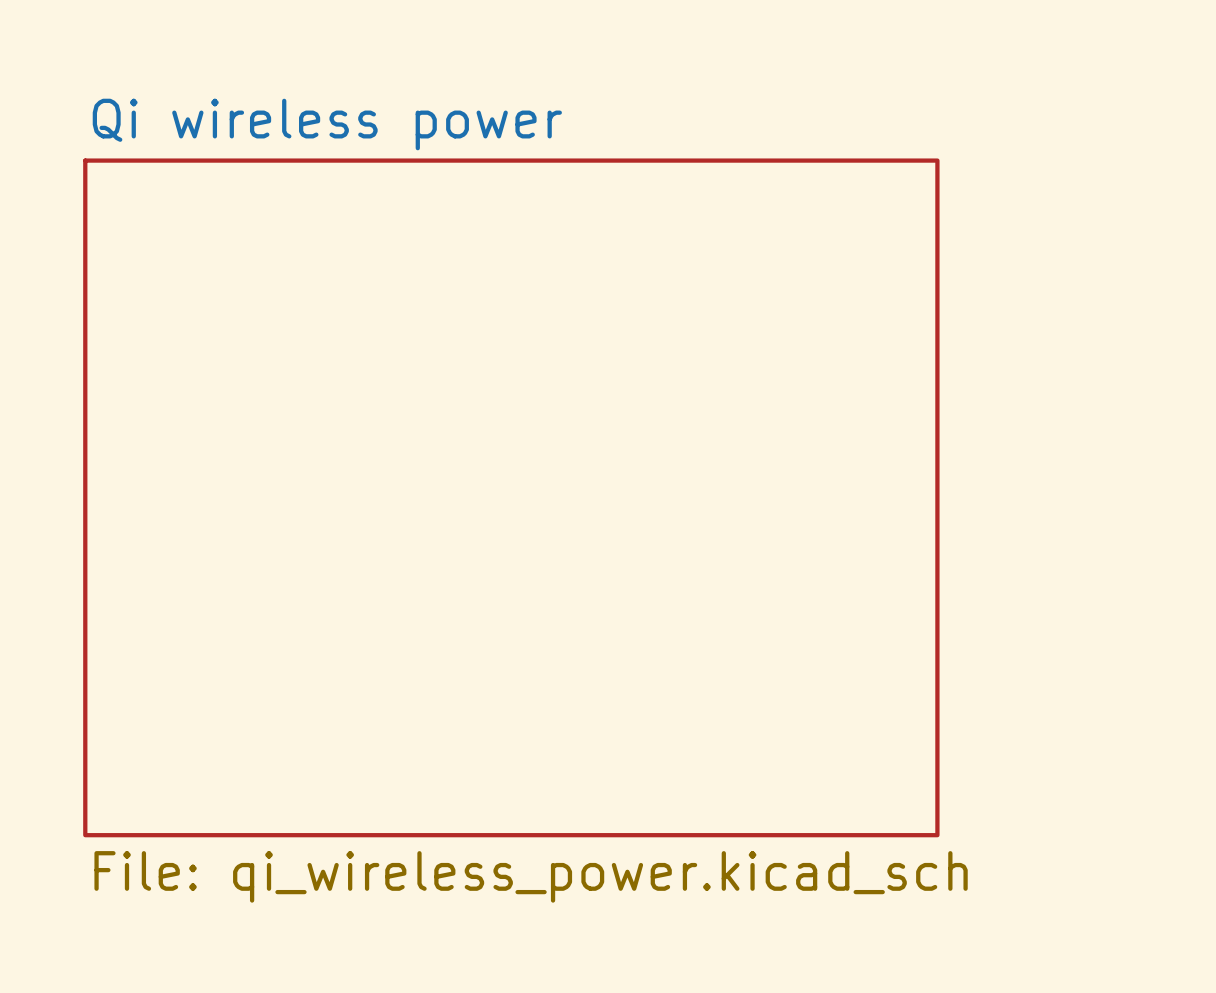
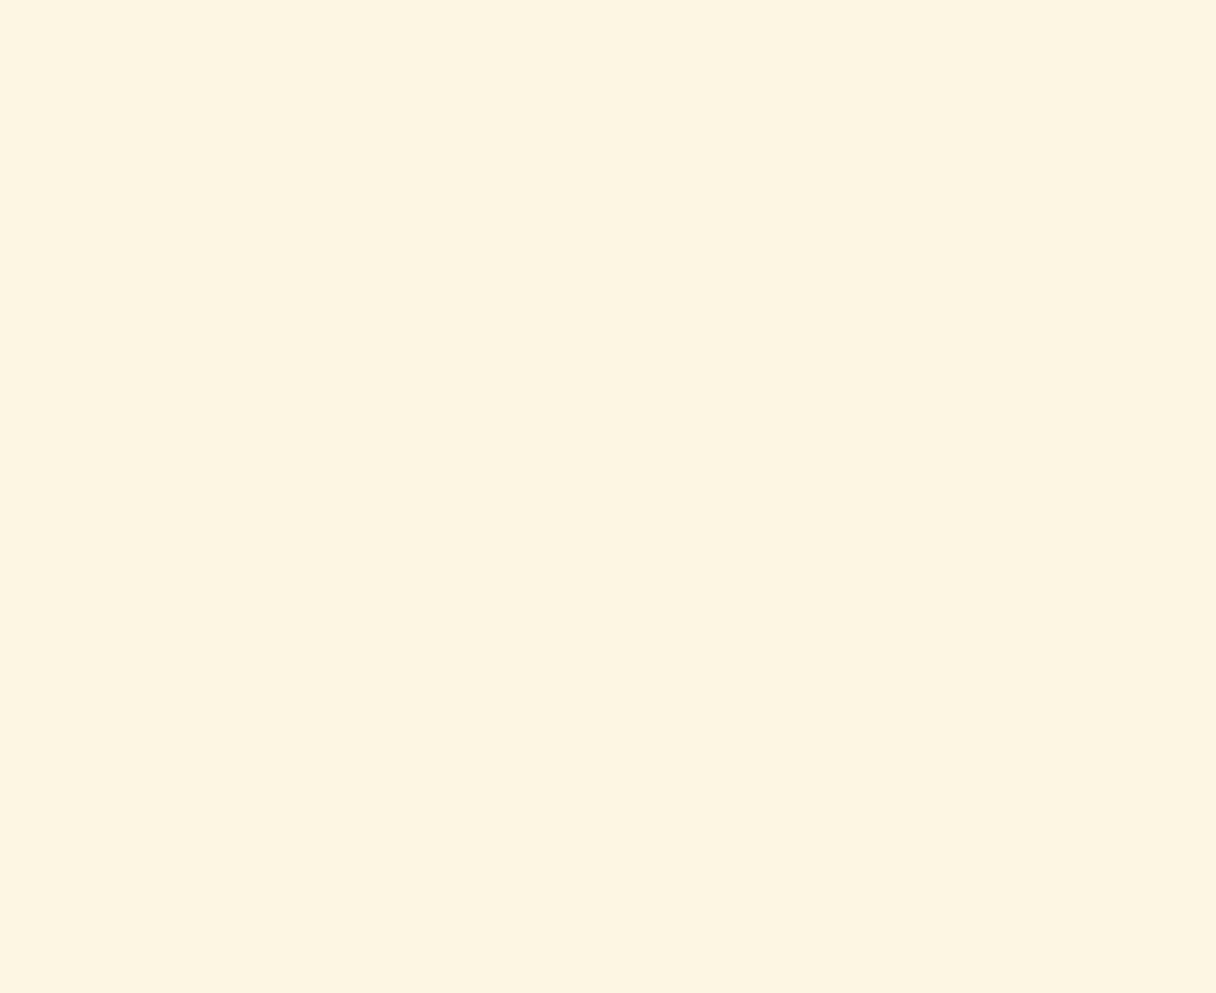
sheet Qi wireless power: File: qi_wireless_power.kicad_sch (511, 497) -> none

